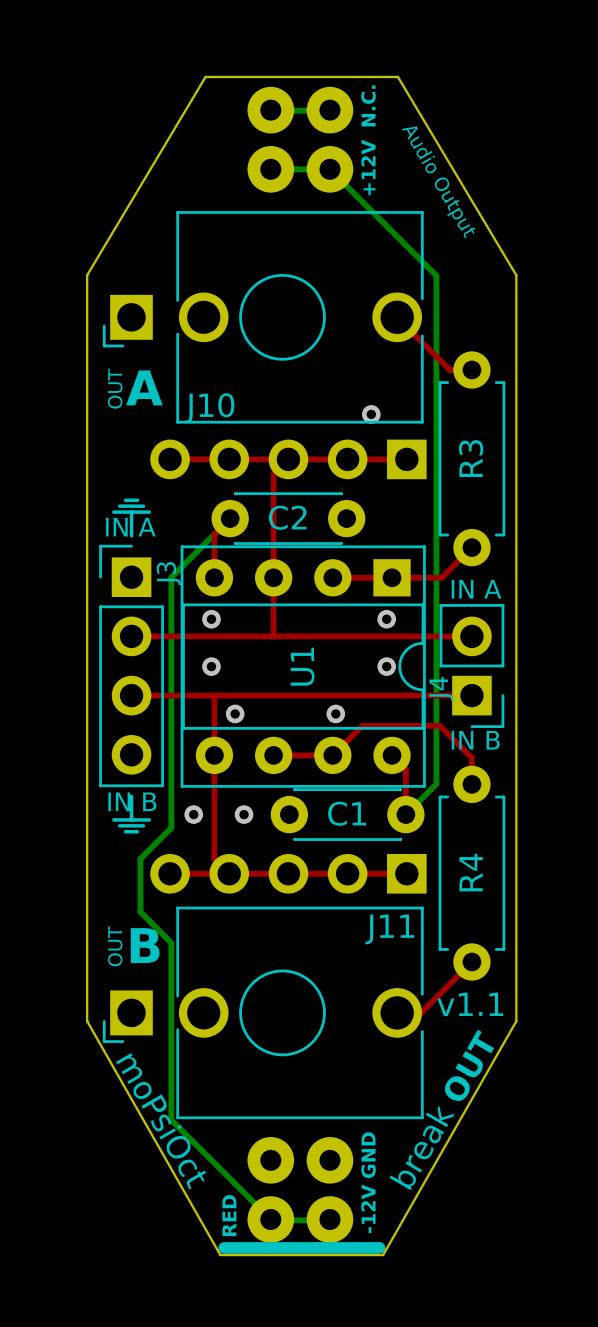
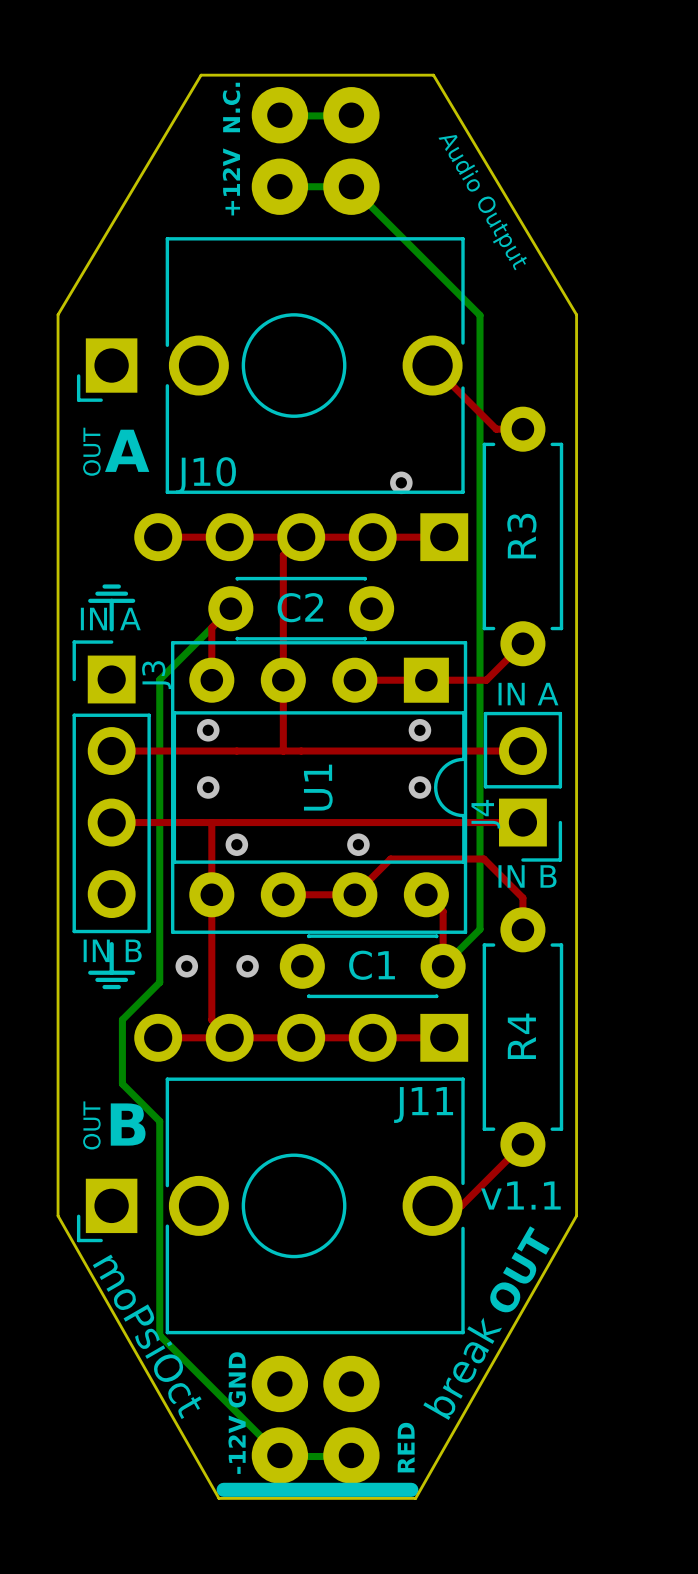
text position: N.C. (368, 105) -> N.C. (231, 107)
text position: +12V (368, 167) -> +12V (231, 181)
text position: GND (368, 1155) -> GND (237, 1379)
text position: -12V (368, 1208) -> -12V (237, 1444)
text position: RED (229, 1215) -> RED (406, 1447)

